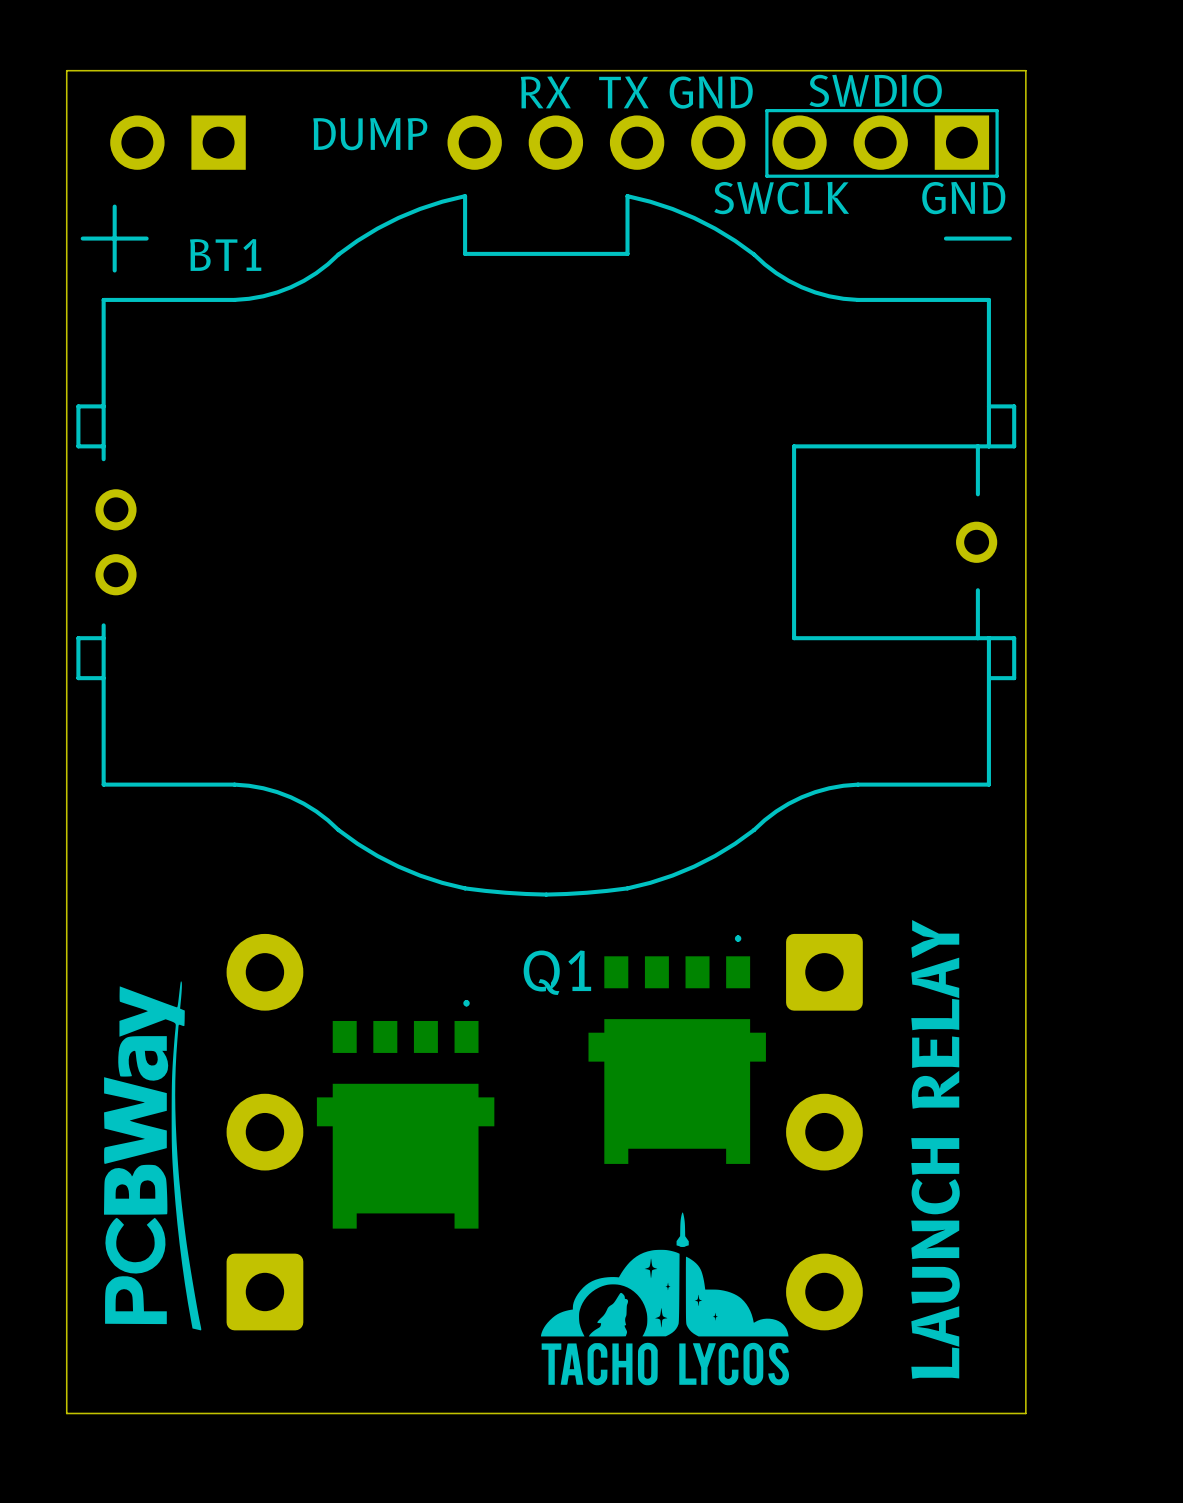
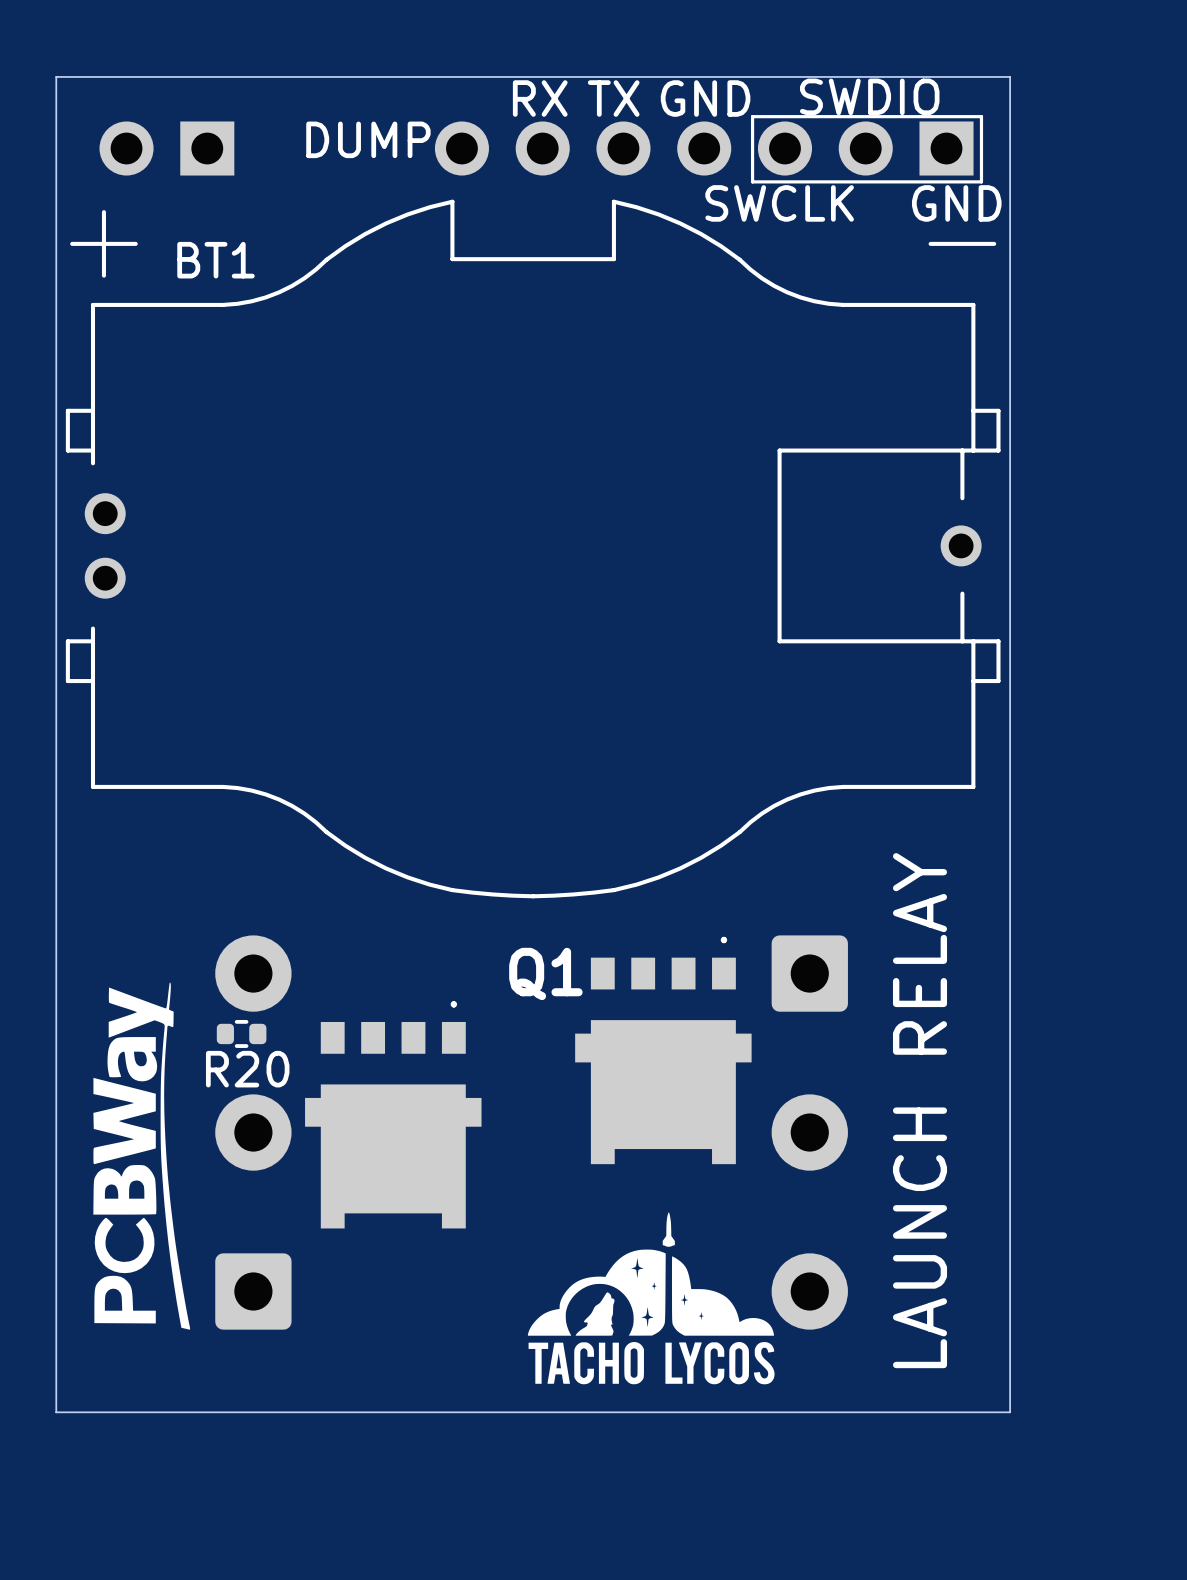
R20: none -> (241, 1033)

